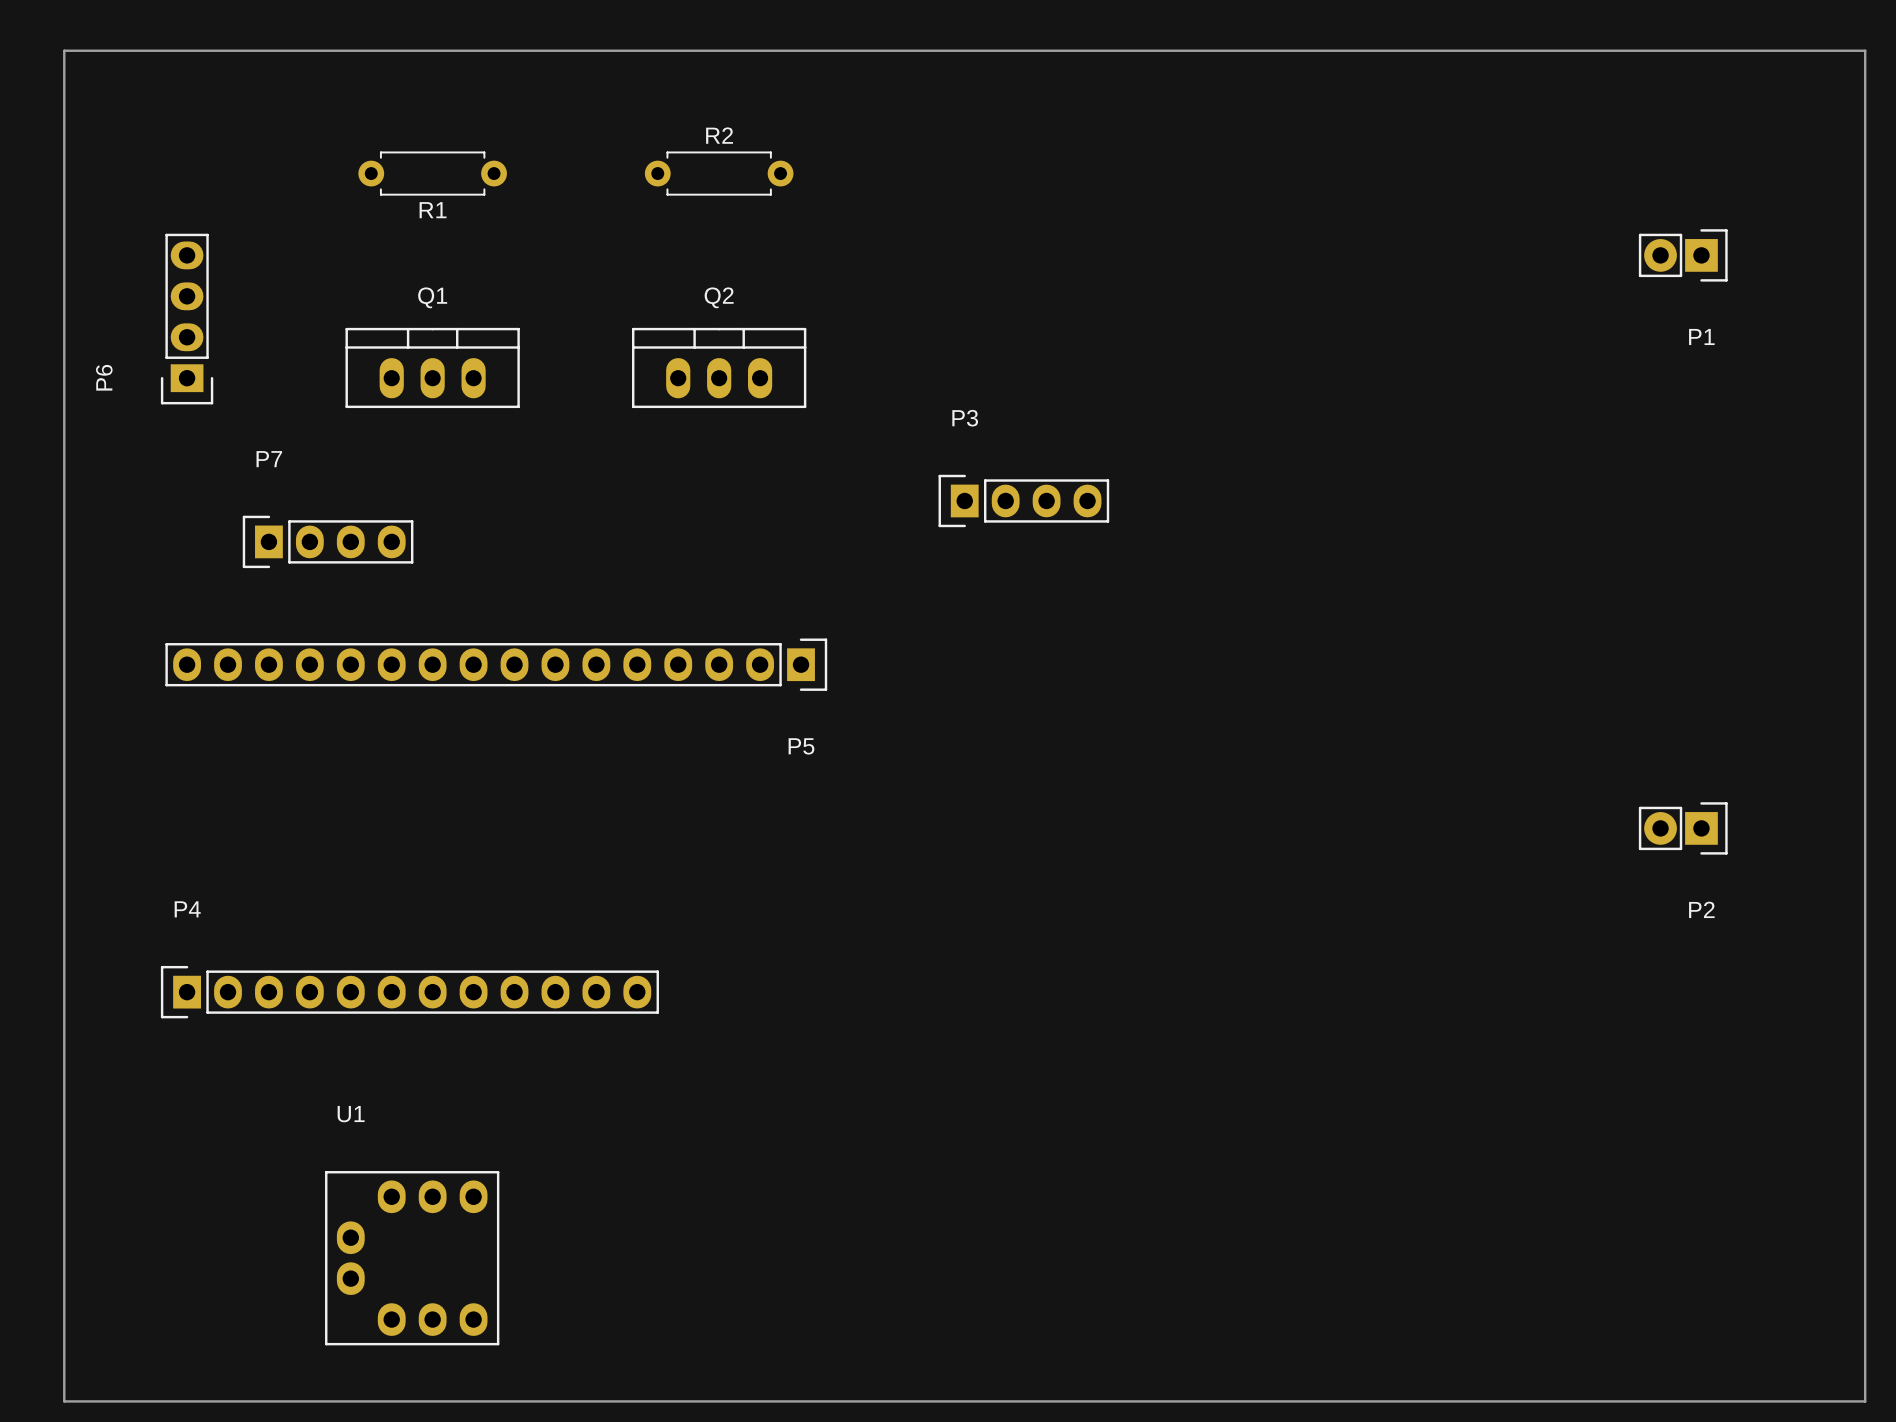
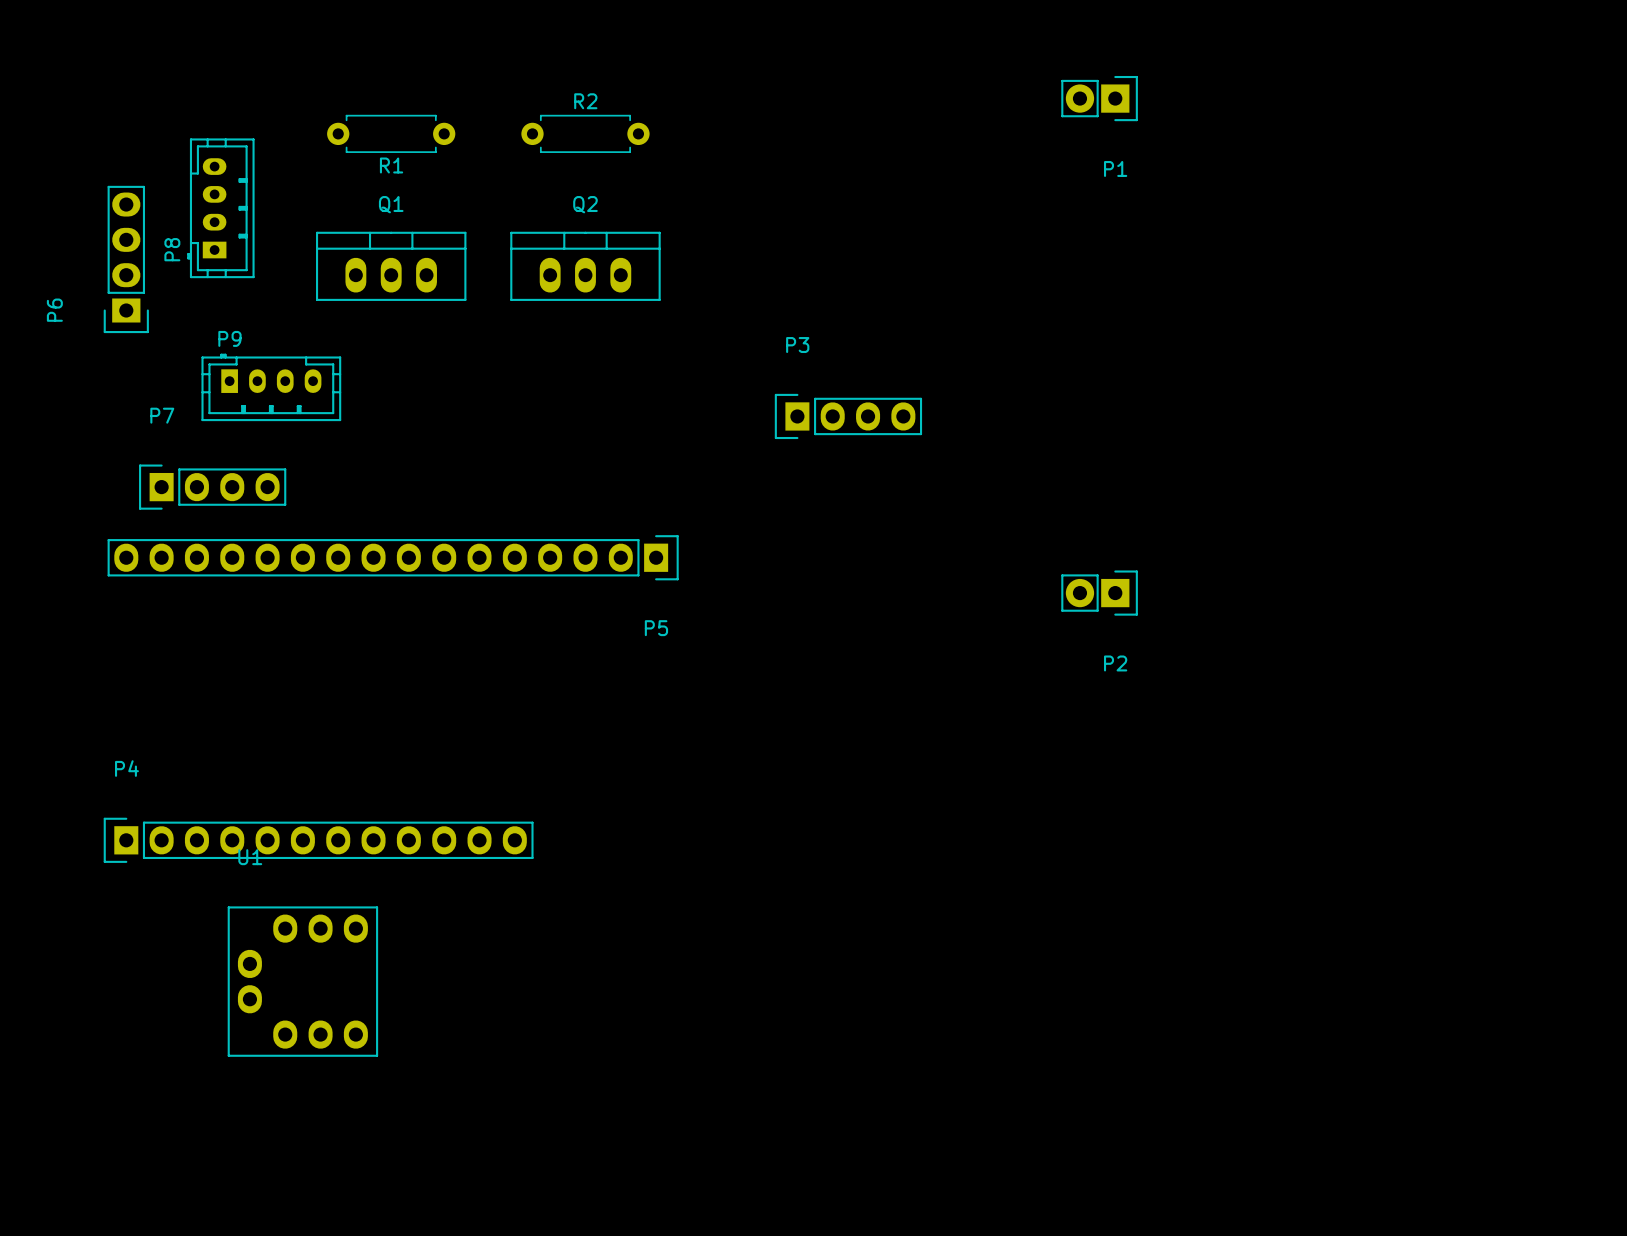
board edge: (64, 50) (1865, 50) (1865, 1401) (64, 1401) (64, 50) -> none
R1 position: (432, 173) -> (391, 133)
P1 position: (1683, 255) -> (1099, 98)
P8: none -> (220, 208)
Q1 position: (432, 367) -> (391, 266)
Q2 position: (719, 367) -> (585, 266)
P9: none -> (271, 387)
P7 position: (328, 541) -> (212, 487)
P2 position: (1683, 828) -> (1099, 593)
U1 position: (412, 1258) -> (302, 981)

